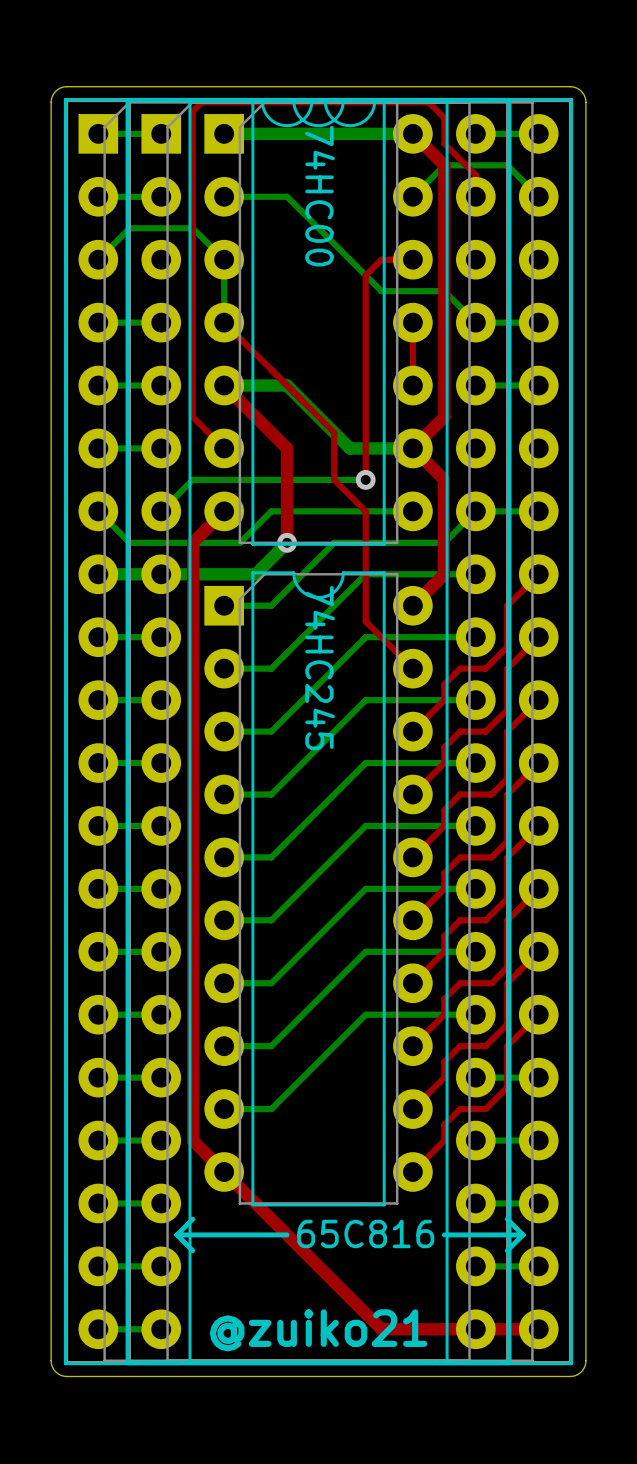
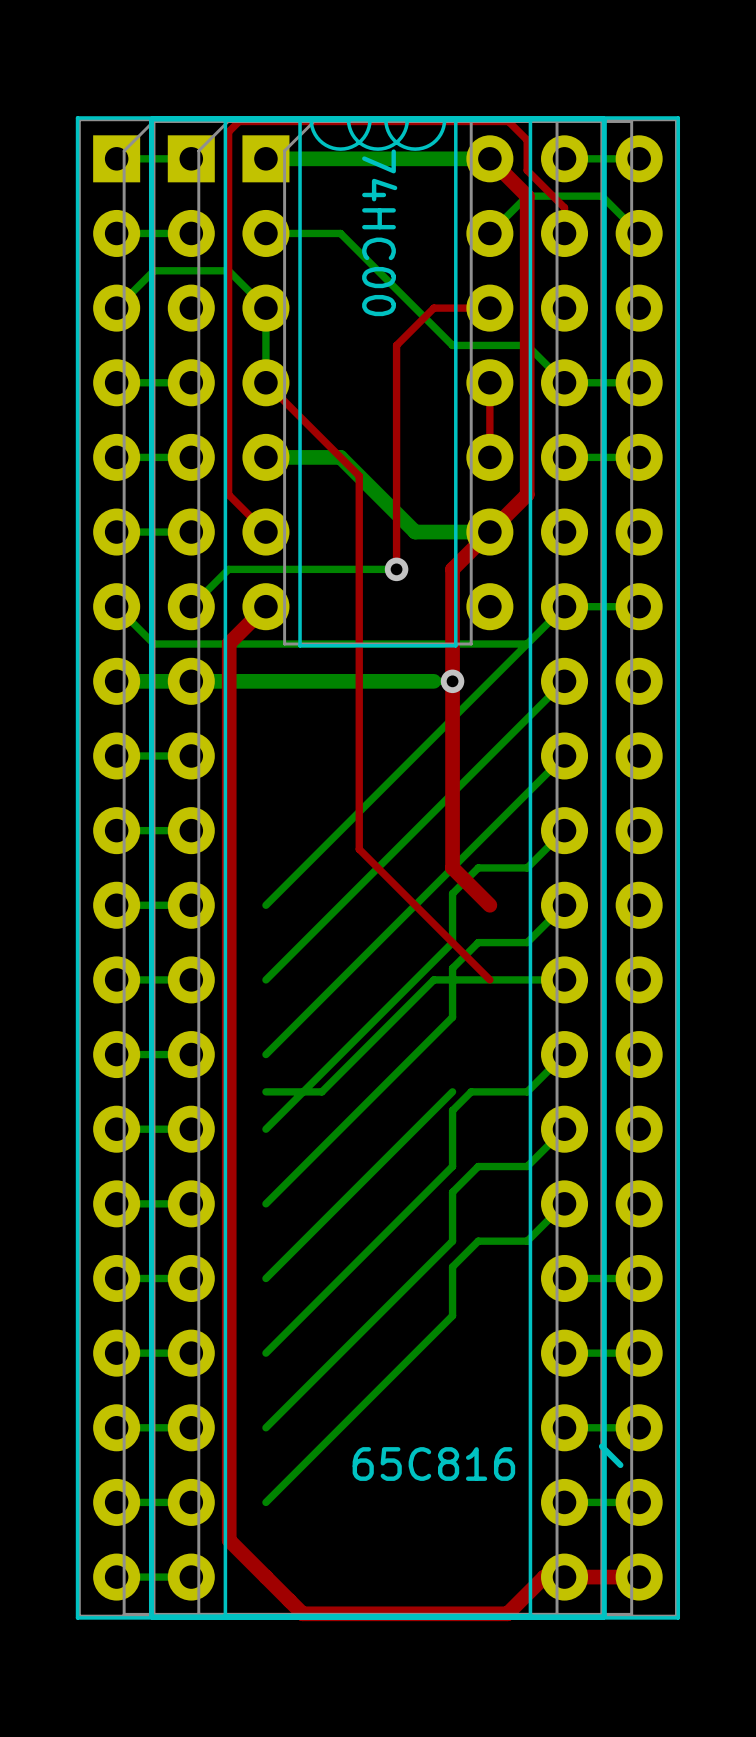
top track: (381, 259) (365, 275) (365, 479) -> (452, 308) (433, 308) (396, 345) (396, 513)
top track: (224, 385) (287, 448) (287, 542) -> none
top track: (302, 401) (334, 432) -> (359, 476) (359, 849) (489, 979)
top track: (412, 448) (443, 479) (443, 574) (412, 605) -> (489, 532) (452, 569) (452, 867) (489, 905)
bottom track: (334, 479) (365, 479) -> none
top track: (334, 479) (365, 511) (365, 621) (412, 668) -> none
via position: (365, 479) -> (396, 569)
bottom track: (412, 511) (271, 511) (239, 542) -> none
bottom track: (287, 542) (255, 574) -> (433, 681) (303, 681)
via: (287, 542) -> none
bottom track: (334, 542) (271, 605) (224, 605) (224, 590) -> (396, 644) (284, 644)
bottom track: none -> (527, 644) (265, 905)
bottom track: (365, 574) (271, 668) (224, 668) -> none
bottom track: (381, 574) (475, 574) -> (265, 979) (564, 681)
via: none -> (452, 681)
top track: (538, 574) (507, 605) (507, 646) (485, 668) (460, 668) (444, 684) (444, 700) (412, 731) -> none
bottom track: (475, 637) (365, 637) (271, 731) (224, 731) -> (564, 755) (265, 1054)
top track: (538, 637) (507, 668) (507, 709) (485, 731) (460, 731) (444, 747) (444, 763) (412, 794) -> none
bottom track: (475, 700) (365, 700) (271, 794) (224, 794) -> (564, 830) (527, 867) (478, 867) (452, 893) (452, 942) (265, 1129)
top track: (538, 700) (507, 731) (507, 778) (491, 794) (460, 794) (444, 810) (444, 825) (412, 857) -> none
bottom track: (475, 763) (365, 763) (271, 857) (224, 857) -> (564, 905) (527, 942) (478, 942) (452, 968) (452, 1017) (265, 1203)
top track: (538, 763) (507, 794) (507, 841) (491, 857) (460, 857) (444, 873) (444, 888) (412, 920) -> none
top track: (538, 825) (507, 857) (507, 898) (485, 920) (460, 920) (444, 936) (444, 951) (412, 983) -> none
part: 74HC245 (318, 888) -> none
bottom track: (475, 888) (365, 888) (271, 983) (224, 983) -> (564, 1054) (527, 1091) (471, 1091) (452, 1110) (452, 1166) (265, 1353)
top track: (538, 888) (507, 920) (507, 967) (491, 983) (460, 983) (444, 998) (444, 1014) (412, 1046) -> none
bottom track: none -> (452, 1091) (265, 1278)
bottom track: (475, 951) (365, 951) (271, 1046) (224, 1046) -> (564, 1129) (527, 1166) (478, 1166) (452, 1192) (452, 1241) (265, 1427)
top track: (538, 951) (507, 983) (507, 1024) (485, 1046) (460, 1046) (444, 1061) (444, 1077) (412, 1109) -> none
bottom track: (475, 1014) (365, 1014) (271, 1109) (224, 1109) -> (564, 1203) (527, 1241) (478, 1241) (452, 1266) (452, 1315) (265, 1502)
top track: (538, 1014) (507, 1046) (507, 1087) (485, 1109) (460, 1109) (444, 1124) (444, 1140) (412, 1172) -> none
top track: (193, 1141) (381, 1329) (458, 1329) -> (229, 1353) (229, 1540) (302, 1613) (507, 1613) (544, 1577)
line: (192, 1219) (176, 1234) -> none
line: (176, 1234) (287, 1234) -> none
line: (176, 1234) (192, 1250) -> none
line: (444, 1234) (523, 1234) (507, 1250) -> none
text: @zuiko21 (318, 1330) -> none
board edge: (66, 1376) (55, 1371) (51, 1360) (52, 96) (57, 89) (66, 86) (576, 87) (583, 94) (585, 102) (584, 1366) (578, 1374) (570, 1376) (66, 1376) -> none

